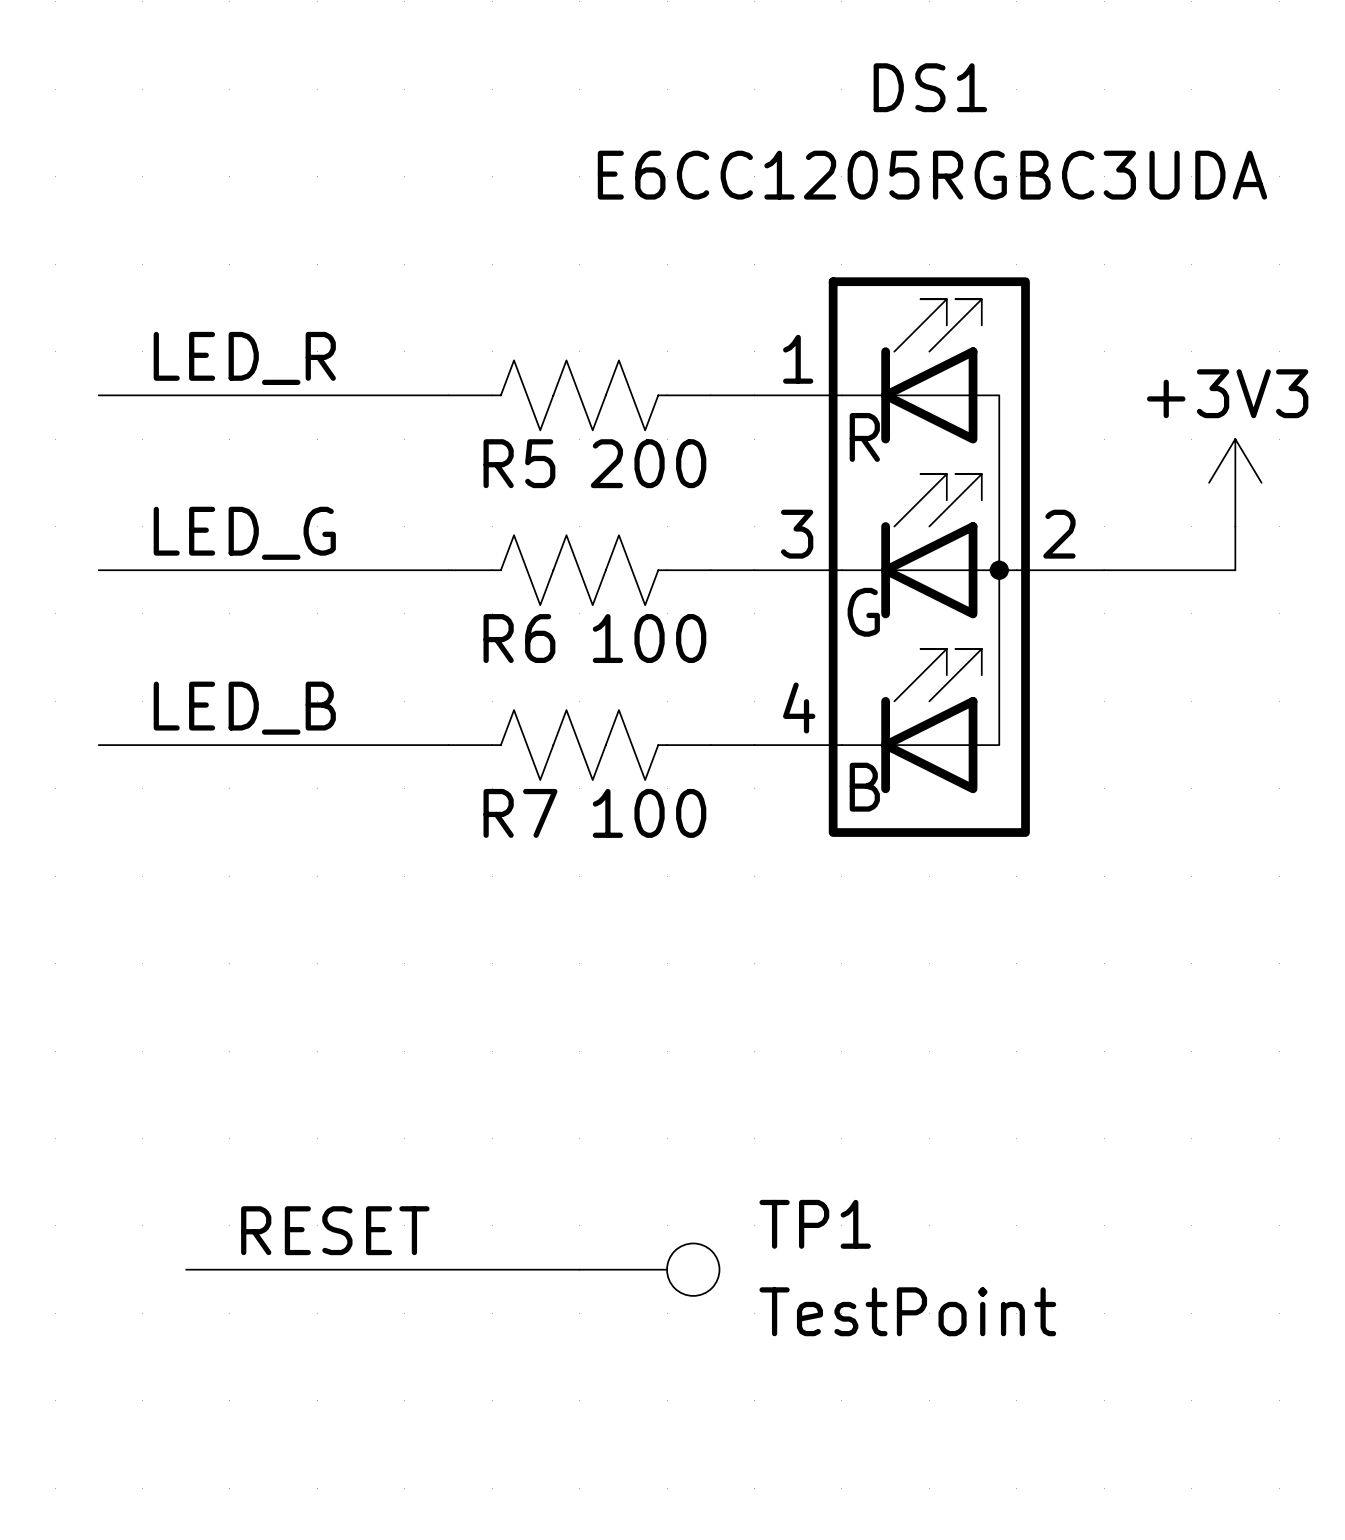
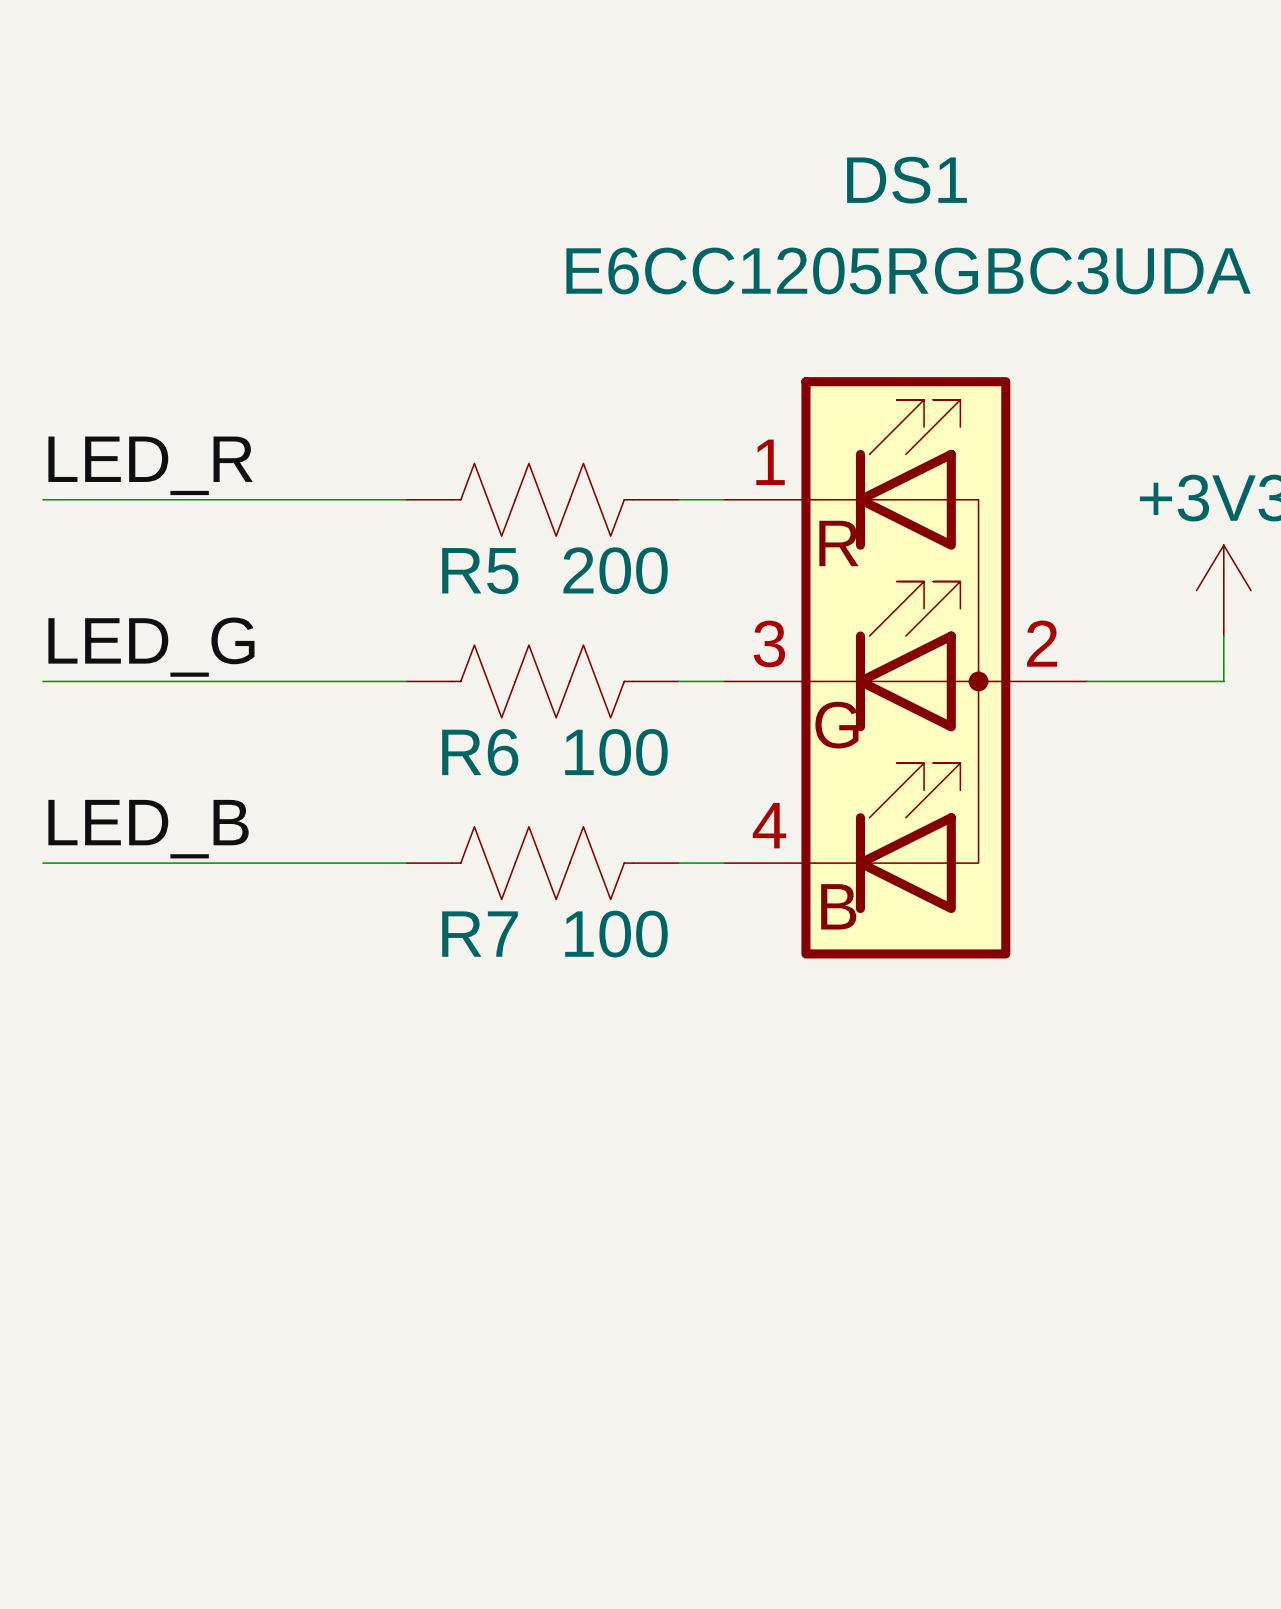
label position: LED_R (244, 358) -> LED_R (150, 465)
label position: LED_G (244, 533) -> LED_G (151, 647)
label position: LED_B (244, 708) -> LED_B (148, 829)
label: RESET (335, 1230) -> none
wire: (186, 1269) (579, 1269) -> none
TP1: TestPoint (649, 1269) -> none

